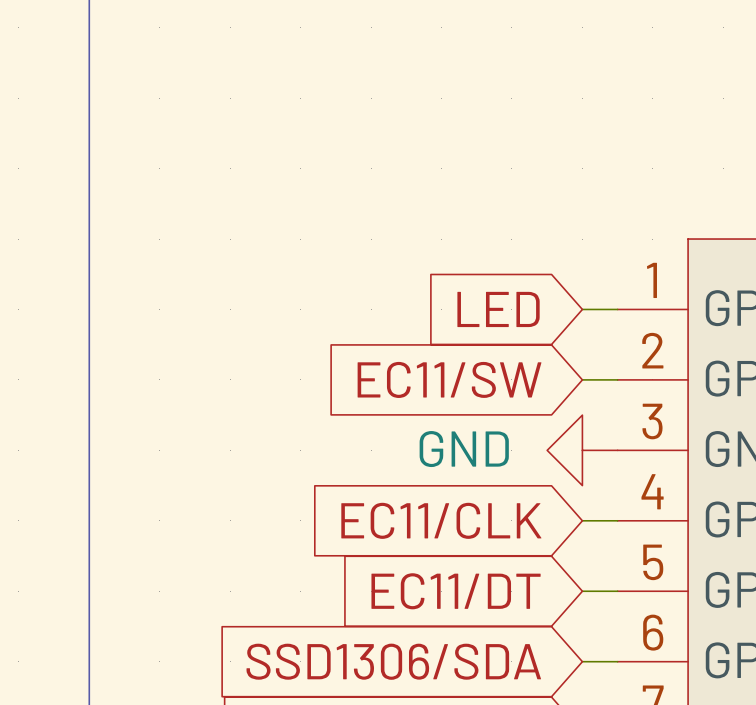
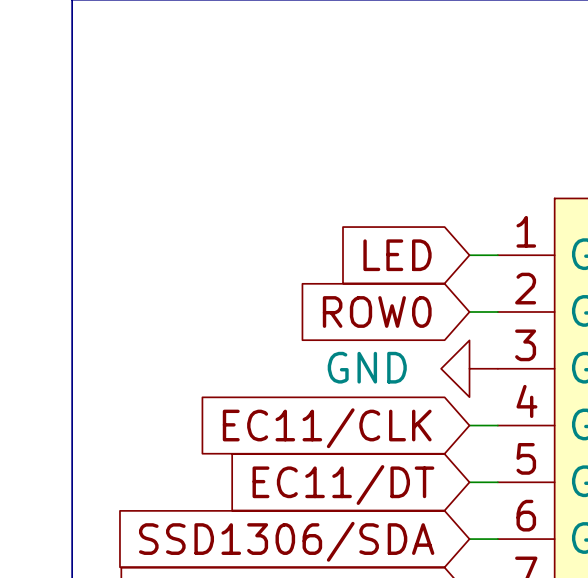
global label: EC11/SW (449, 379) -> ROW0 (377, 311)

